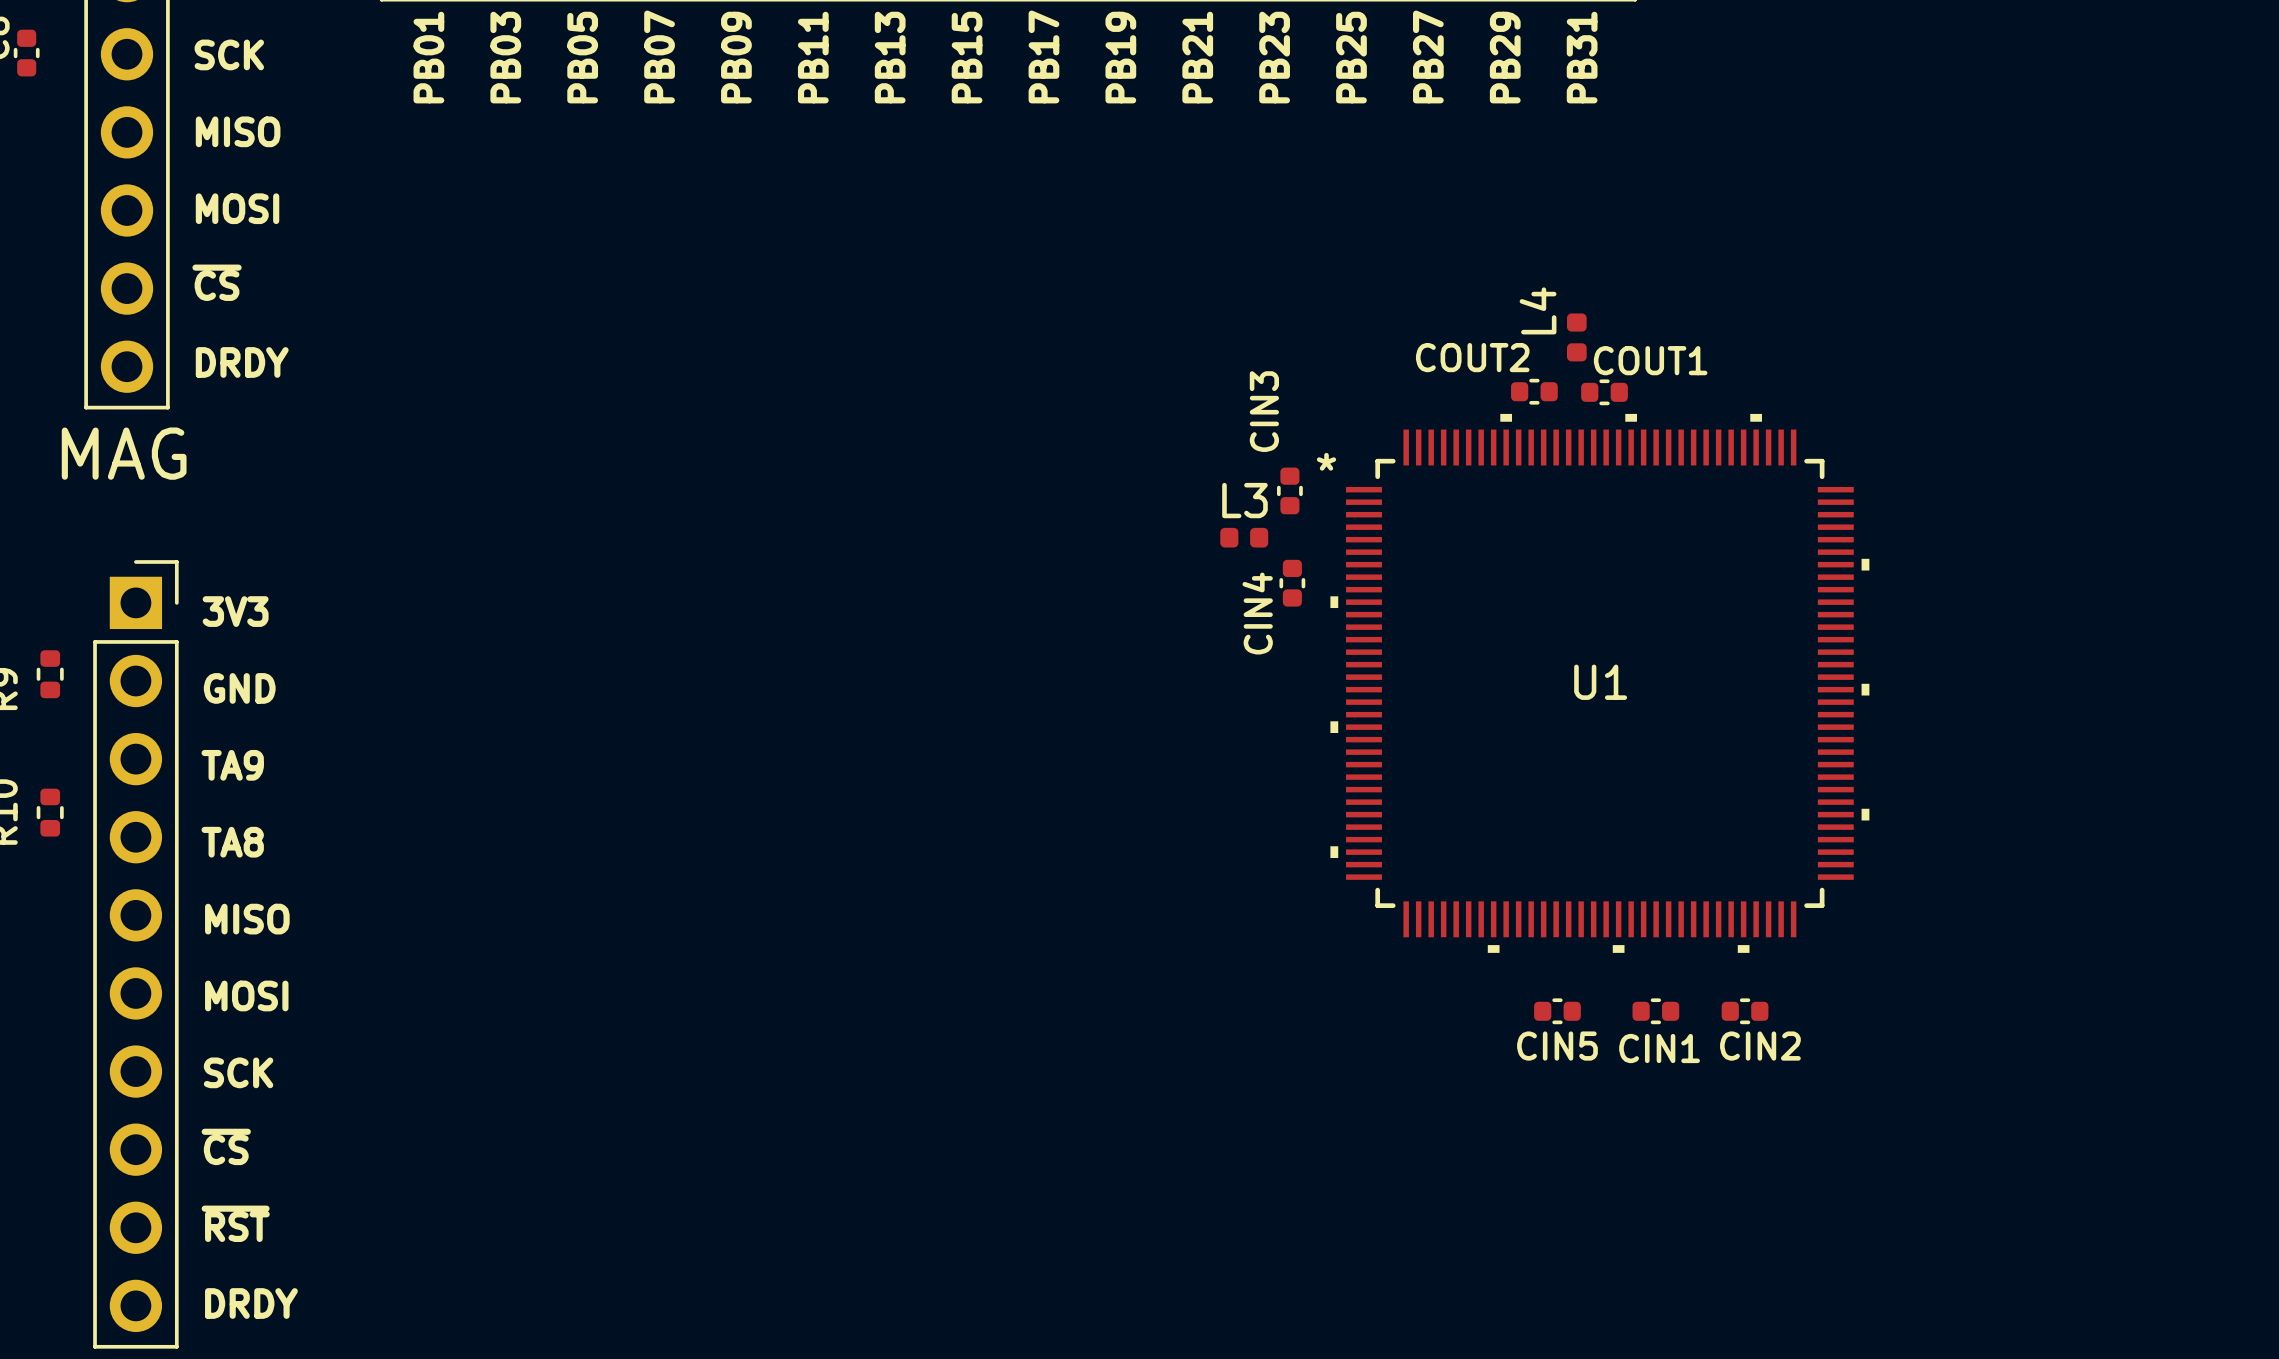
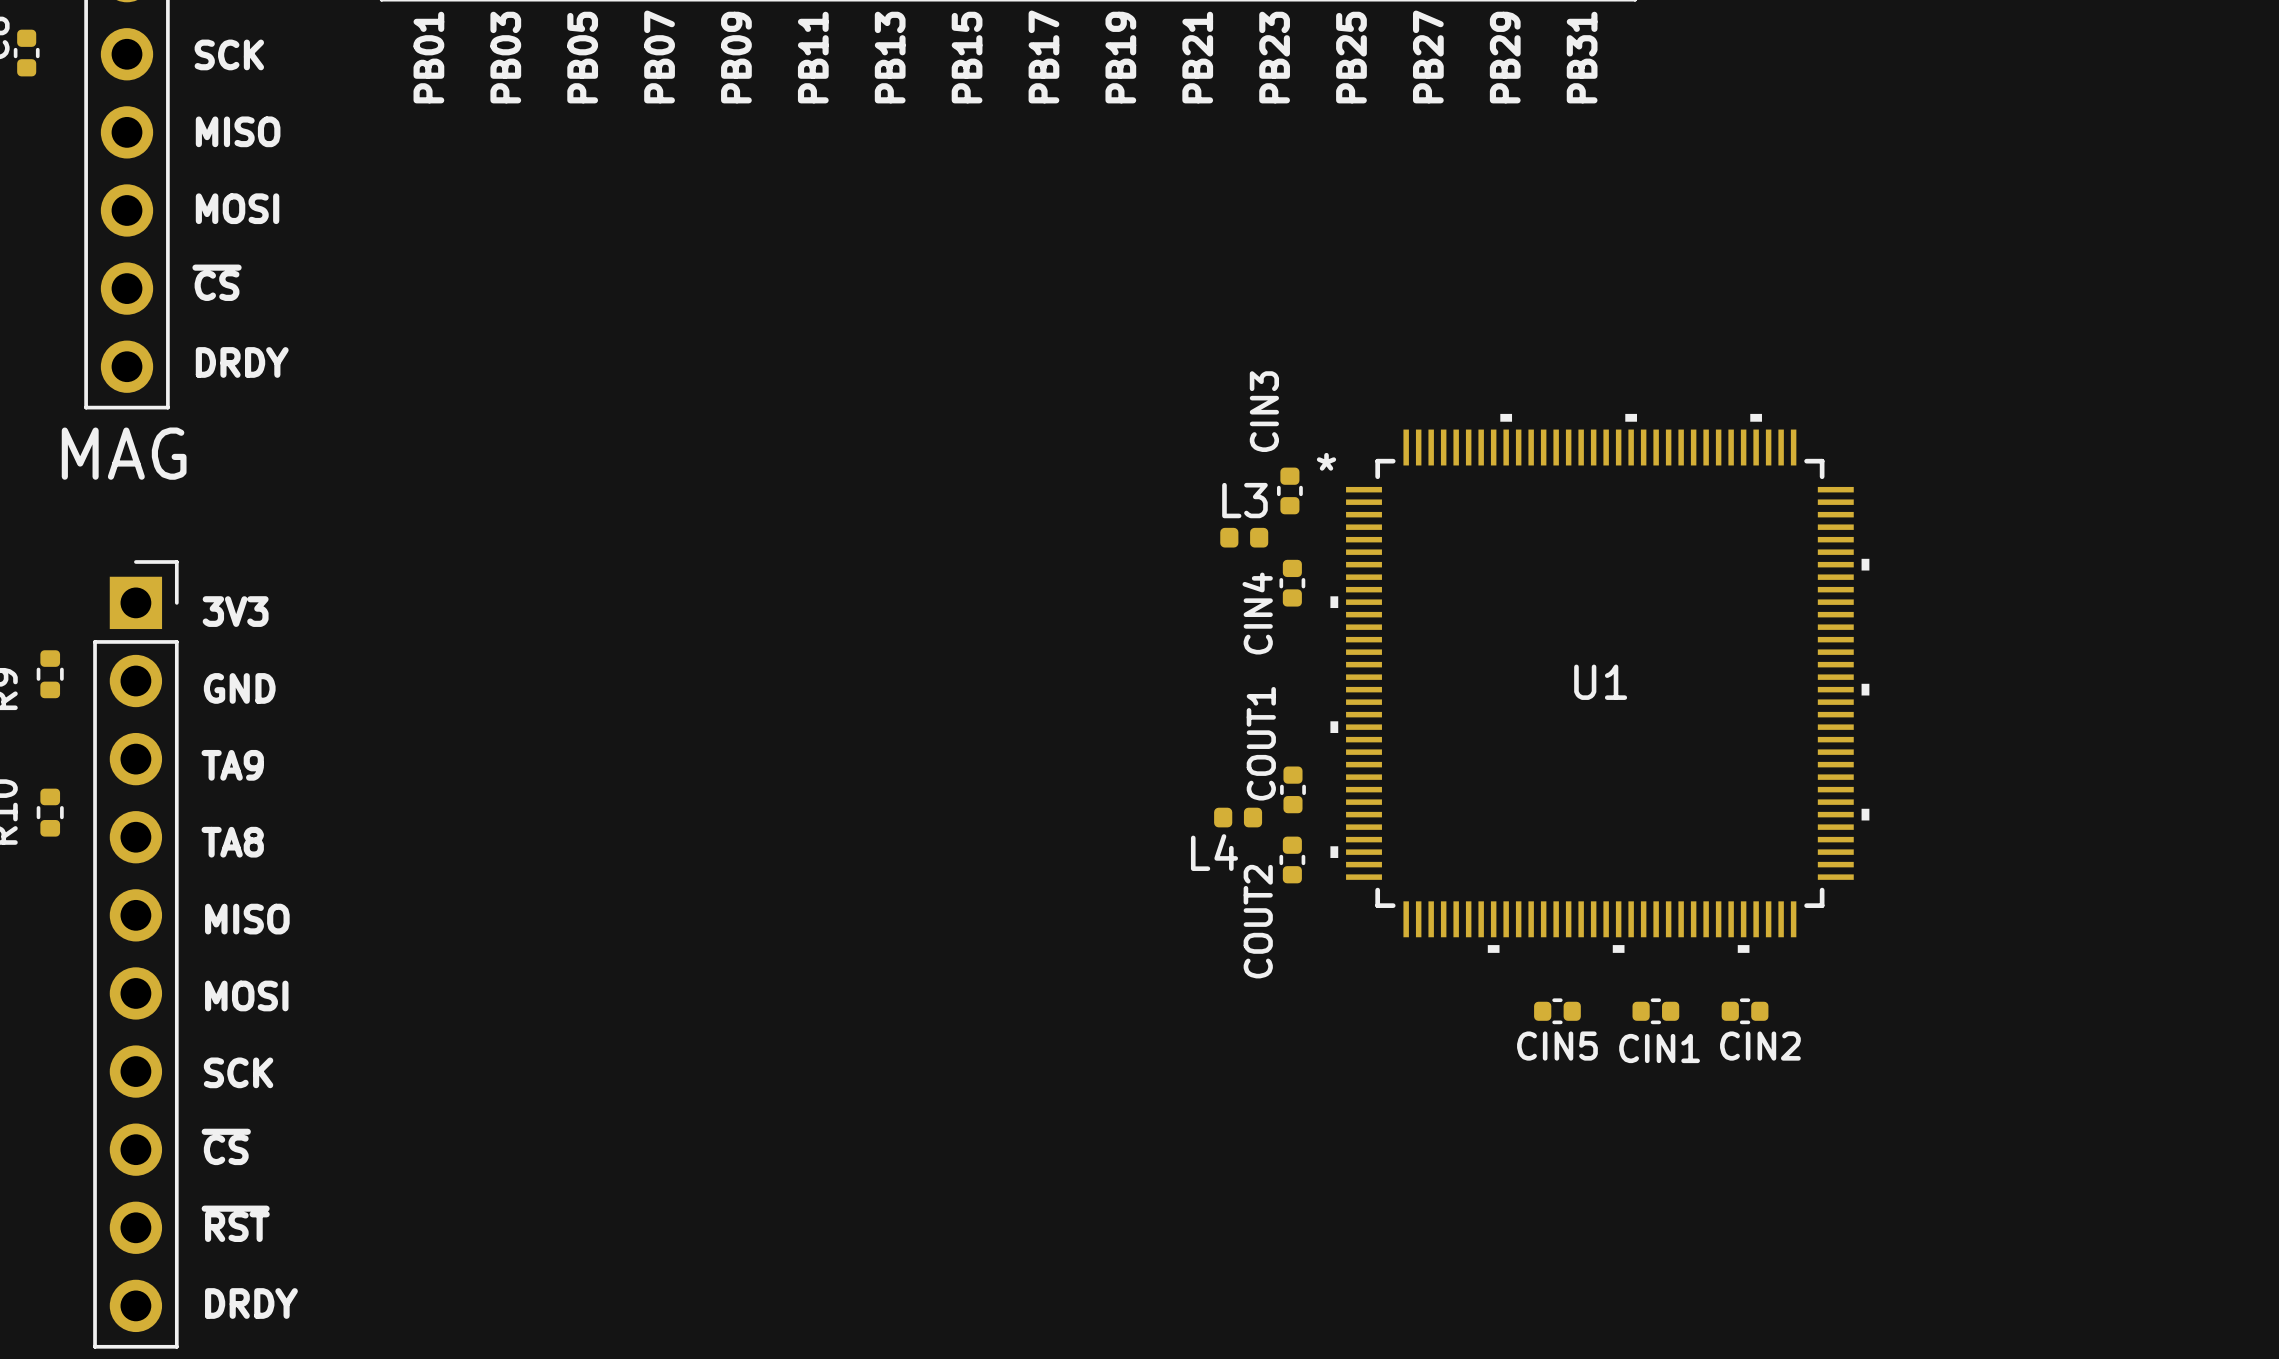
L4 name position: L4 (1538, 310) -> L4 (1214, 852)
L4 rotation: 0° (1576, 337) -> 90° clockwise (1238, 817)
L4 position: (1576, 337) -> (1238, 817)
COUT2 name position: COUT2 (1472, 357) -> COUT2 (1258, 921)
COUT1 name position: COUT1 (1650, 360) -> COUT1 (1261, 743)
COUT2 rotation: 0° (1534, 391) -> 90° clockwise (1292, 859)
COUT2 position: (1534, 391) -> (1292, 859)
COUT1 rotation: 0° (1604, 392) -> 90° clockwise (1292, 789)
COUT1 position: (1604, 392) -> (1292, 789)

